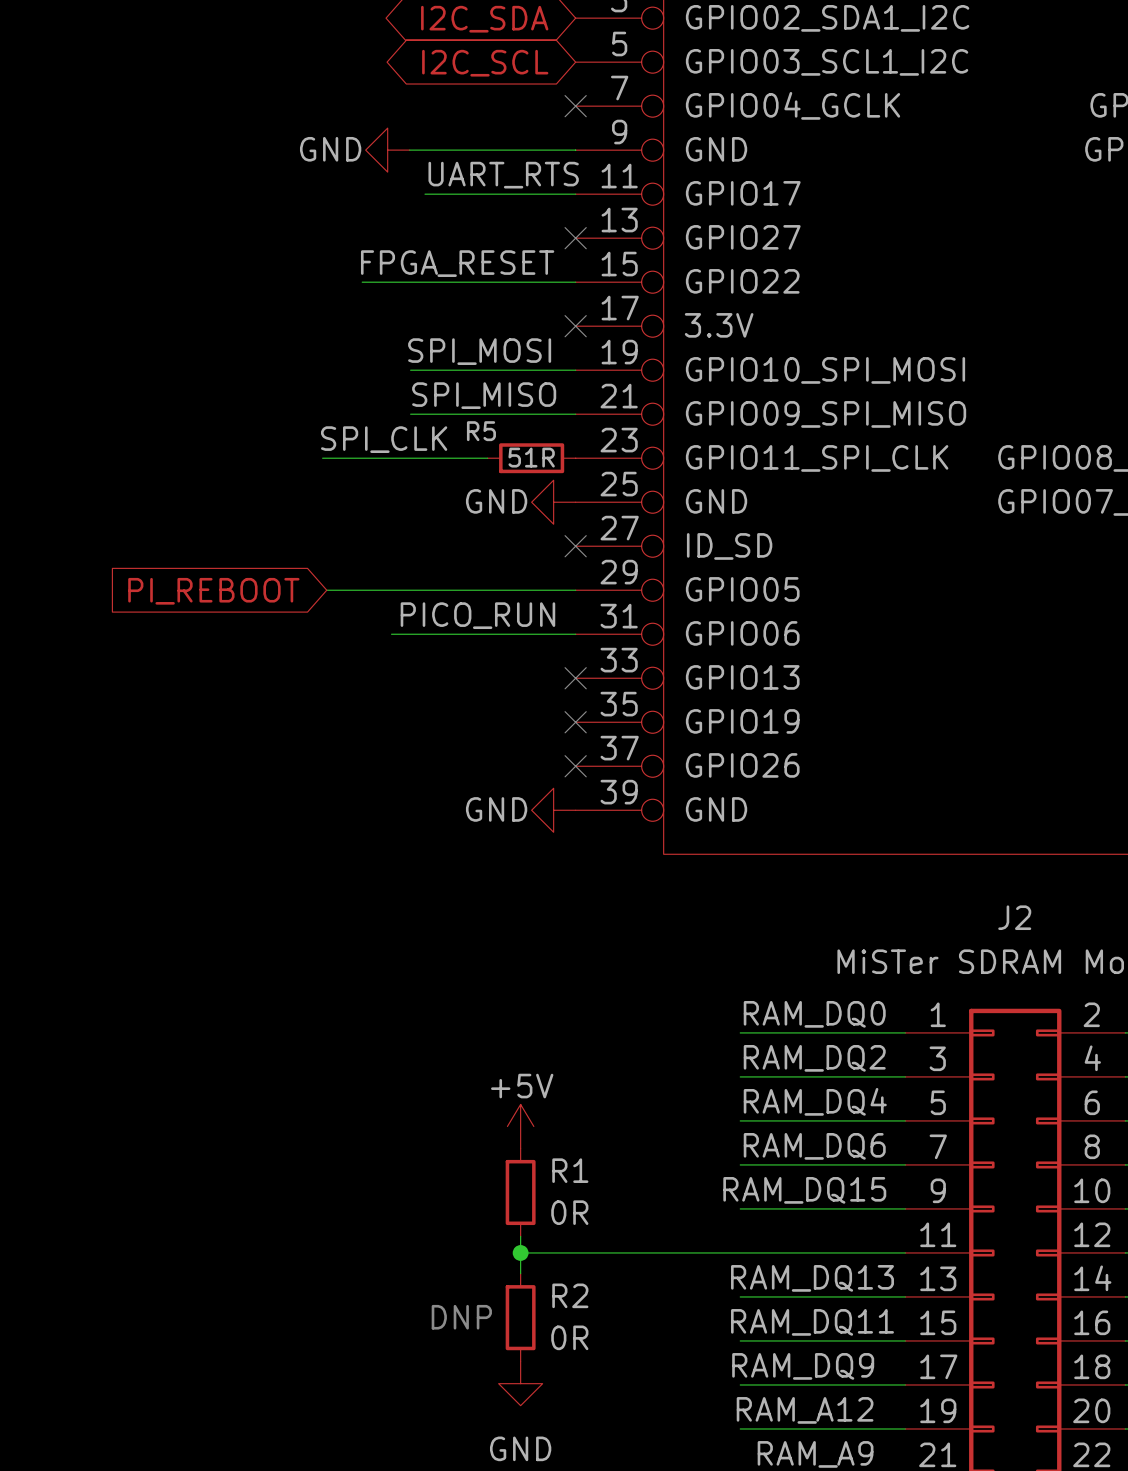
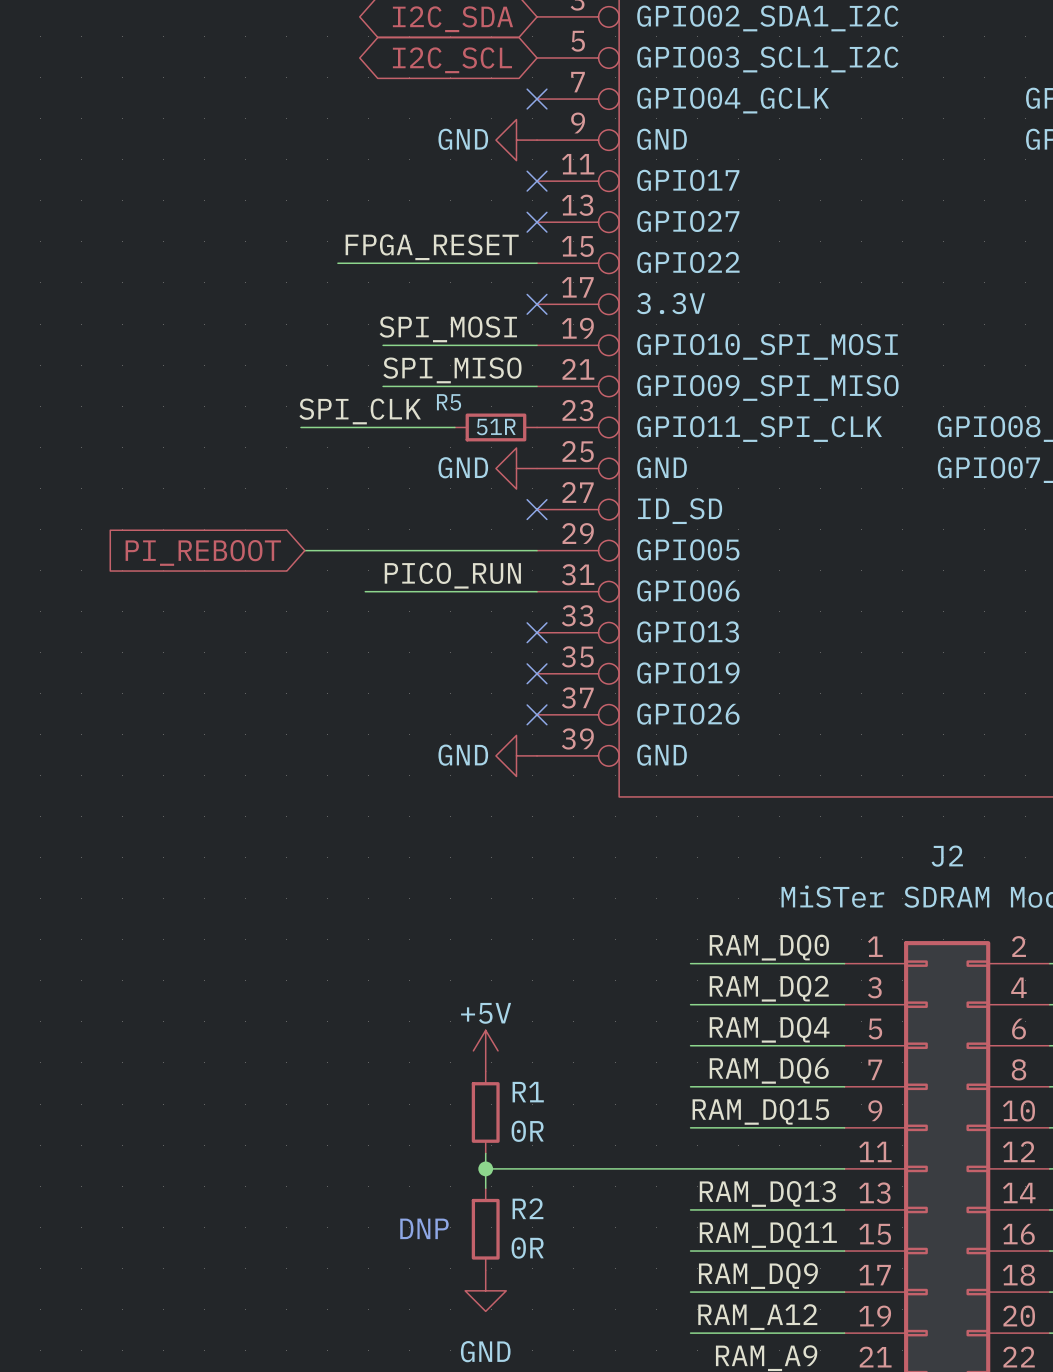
power symbol position: GND (387, 150) -> GND (516, 140)
wire: (409, 150) (575, 150) -> none
label: UART_RTS (503, 175) -> none
wire: (424, 194) (575, 194) -> none
no-connect mark: none -> (537, 181)

